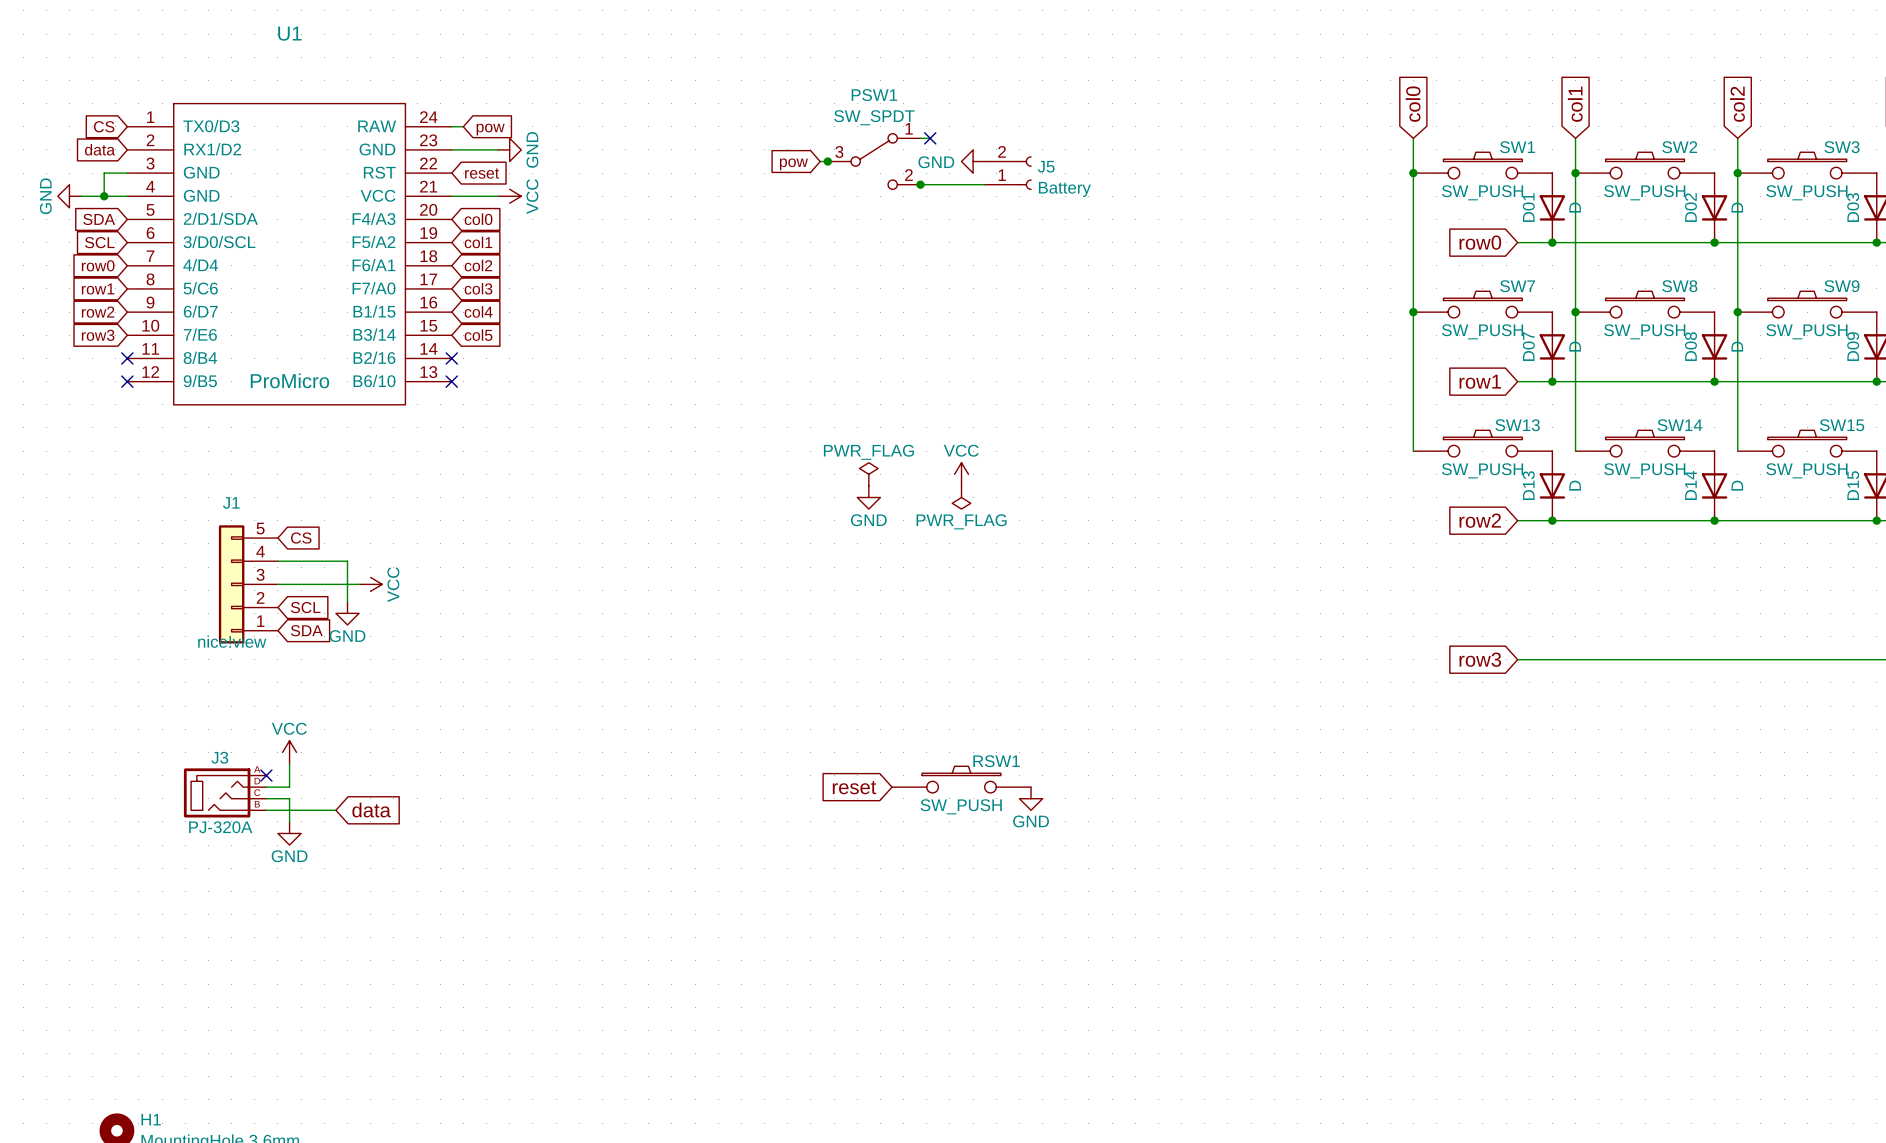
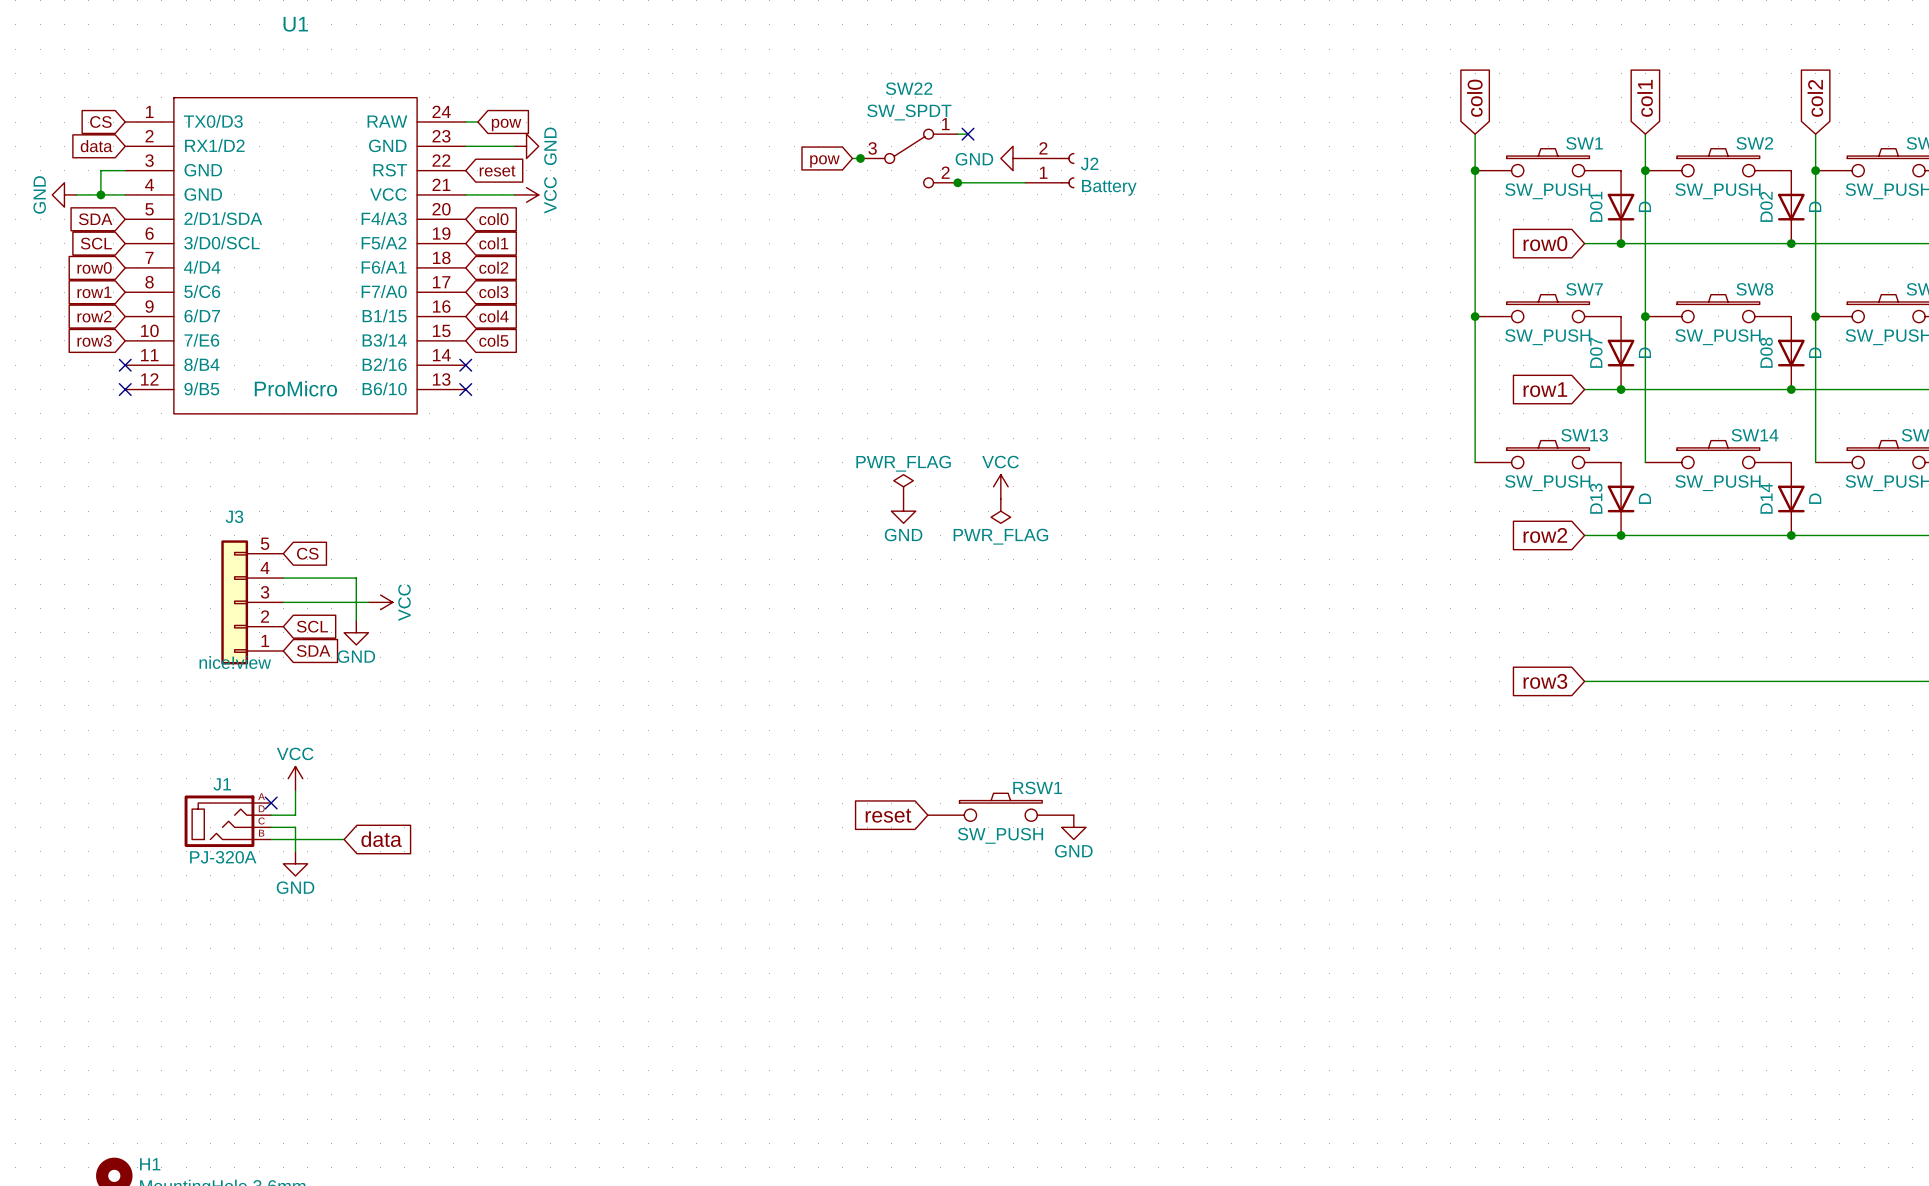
PSW1 name: PSW1 (874, 95) -> SW22 (909, 88)
J5 name: J5 (1046, 166) -> J2 (1089, 163)
J1 name: J1 (231, 502) -> J3 (234, 516)
J3 name: J3 (219, 757) -> J1 (222, 784)

